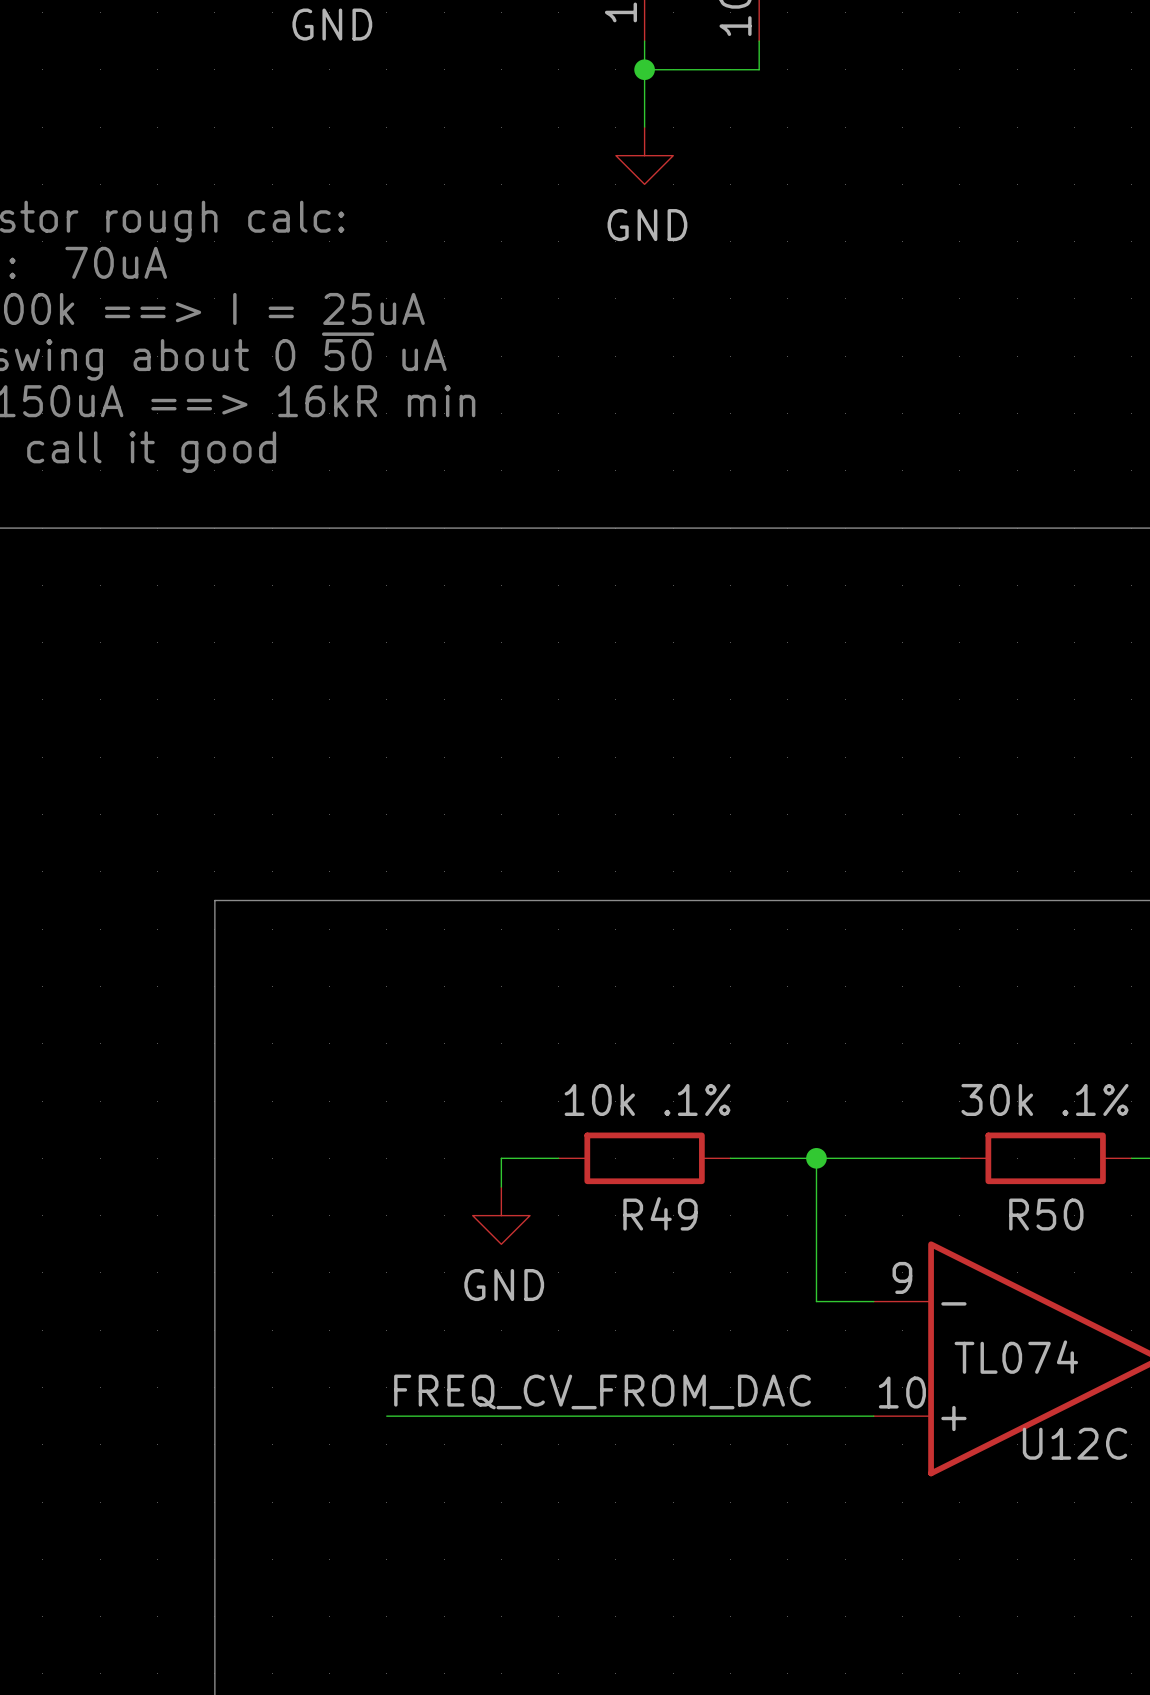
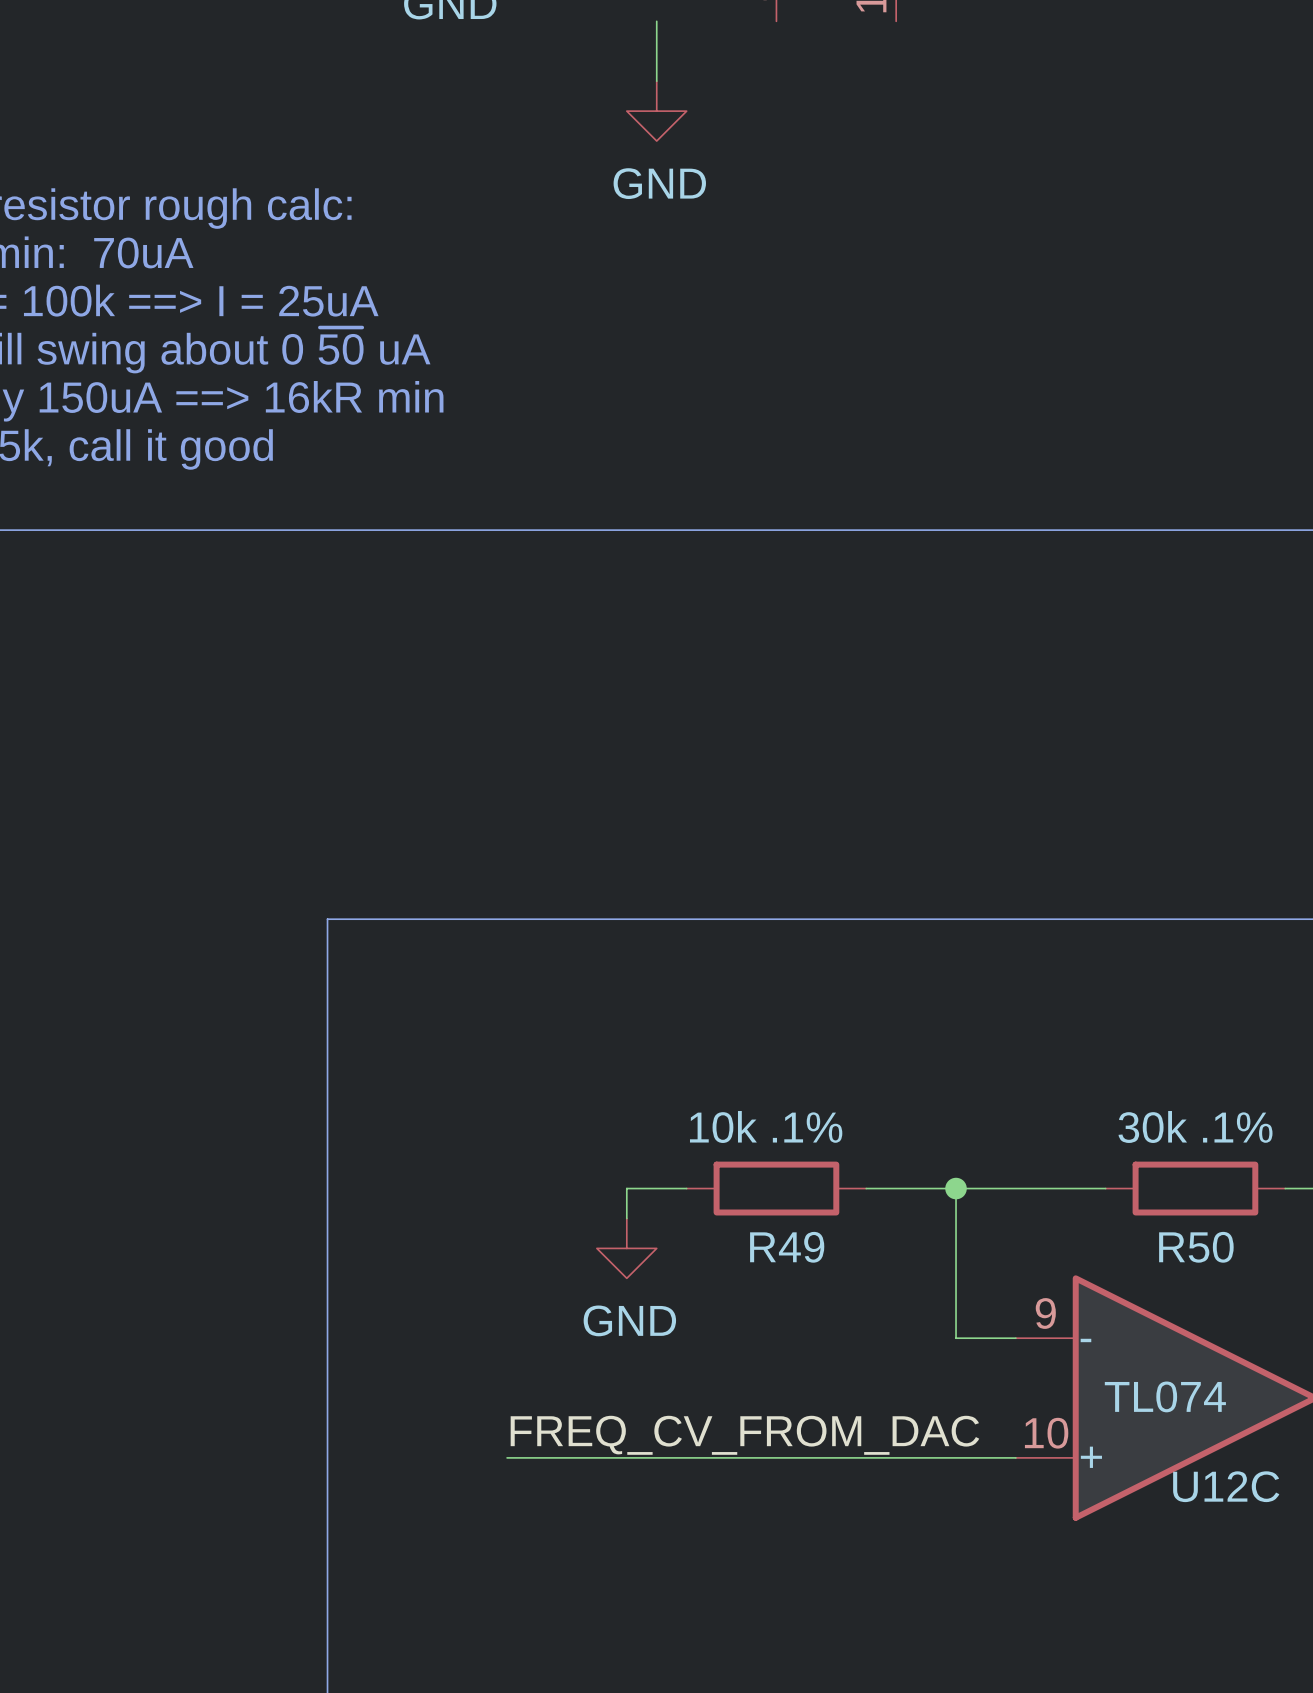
wire: none -> (656, 21) (656, 81)
wire: (644, 41) (644, 127) -> none
wire: (759, 41) (759, 69) (644, 69) -> none
junction: (644, 69) -> none
power symbol position: GND (644, 155) -> GND (656, 111)

